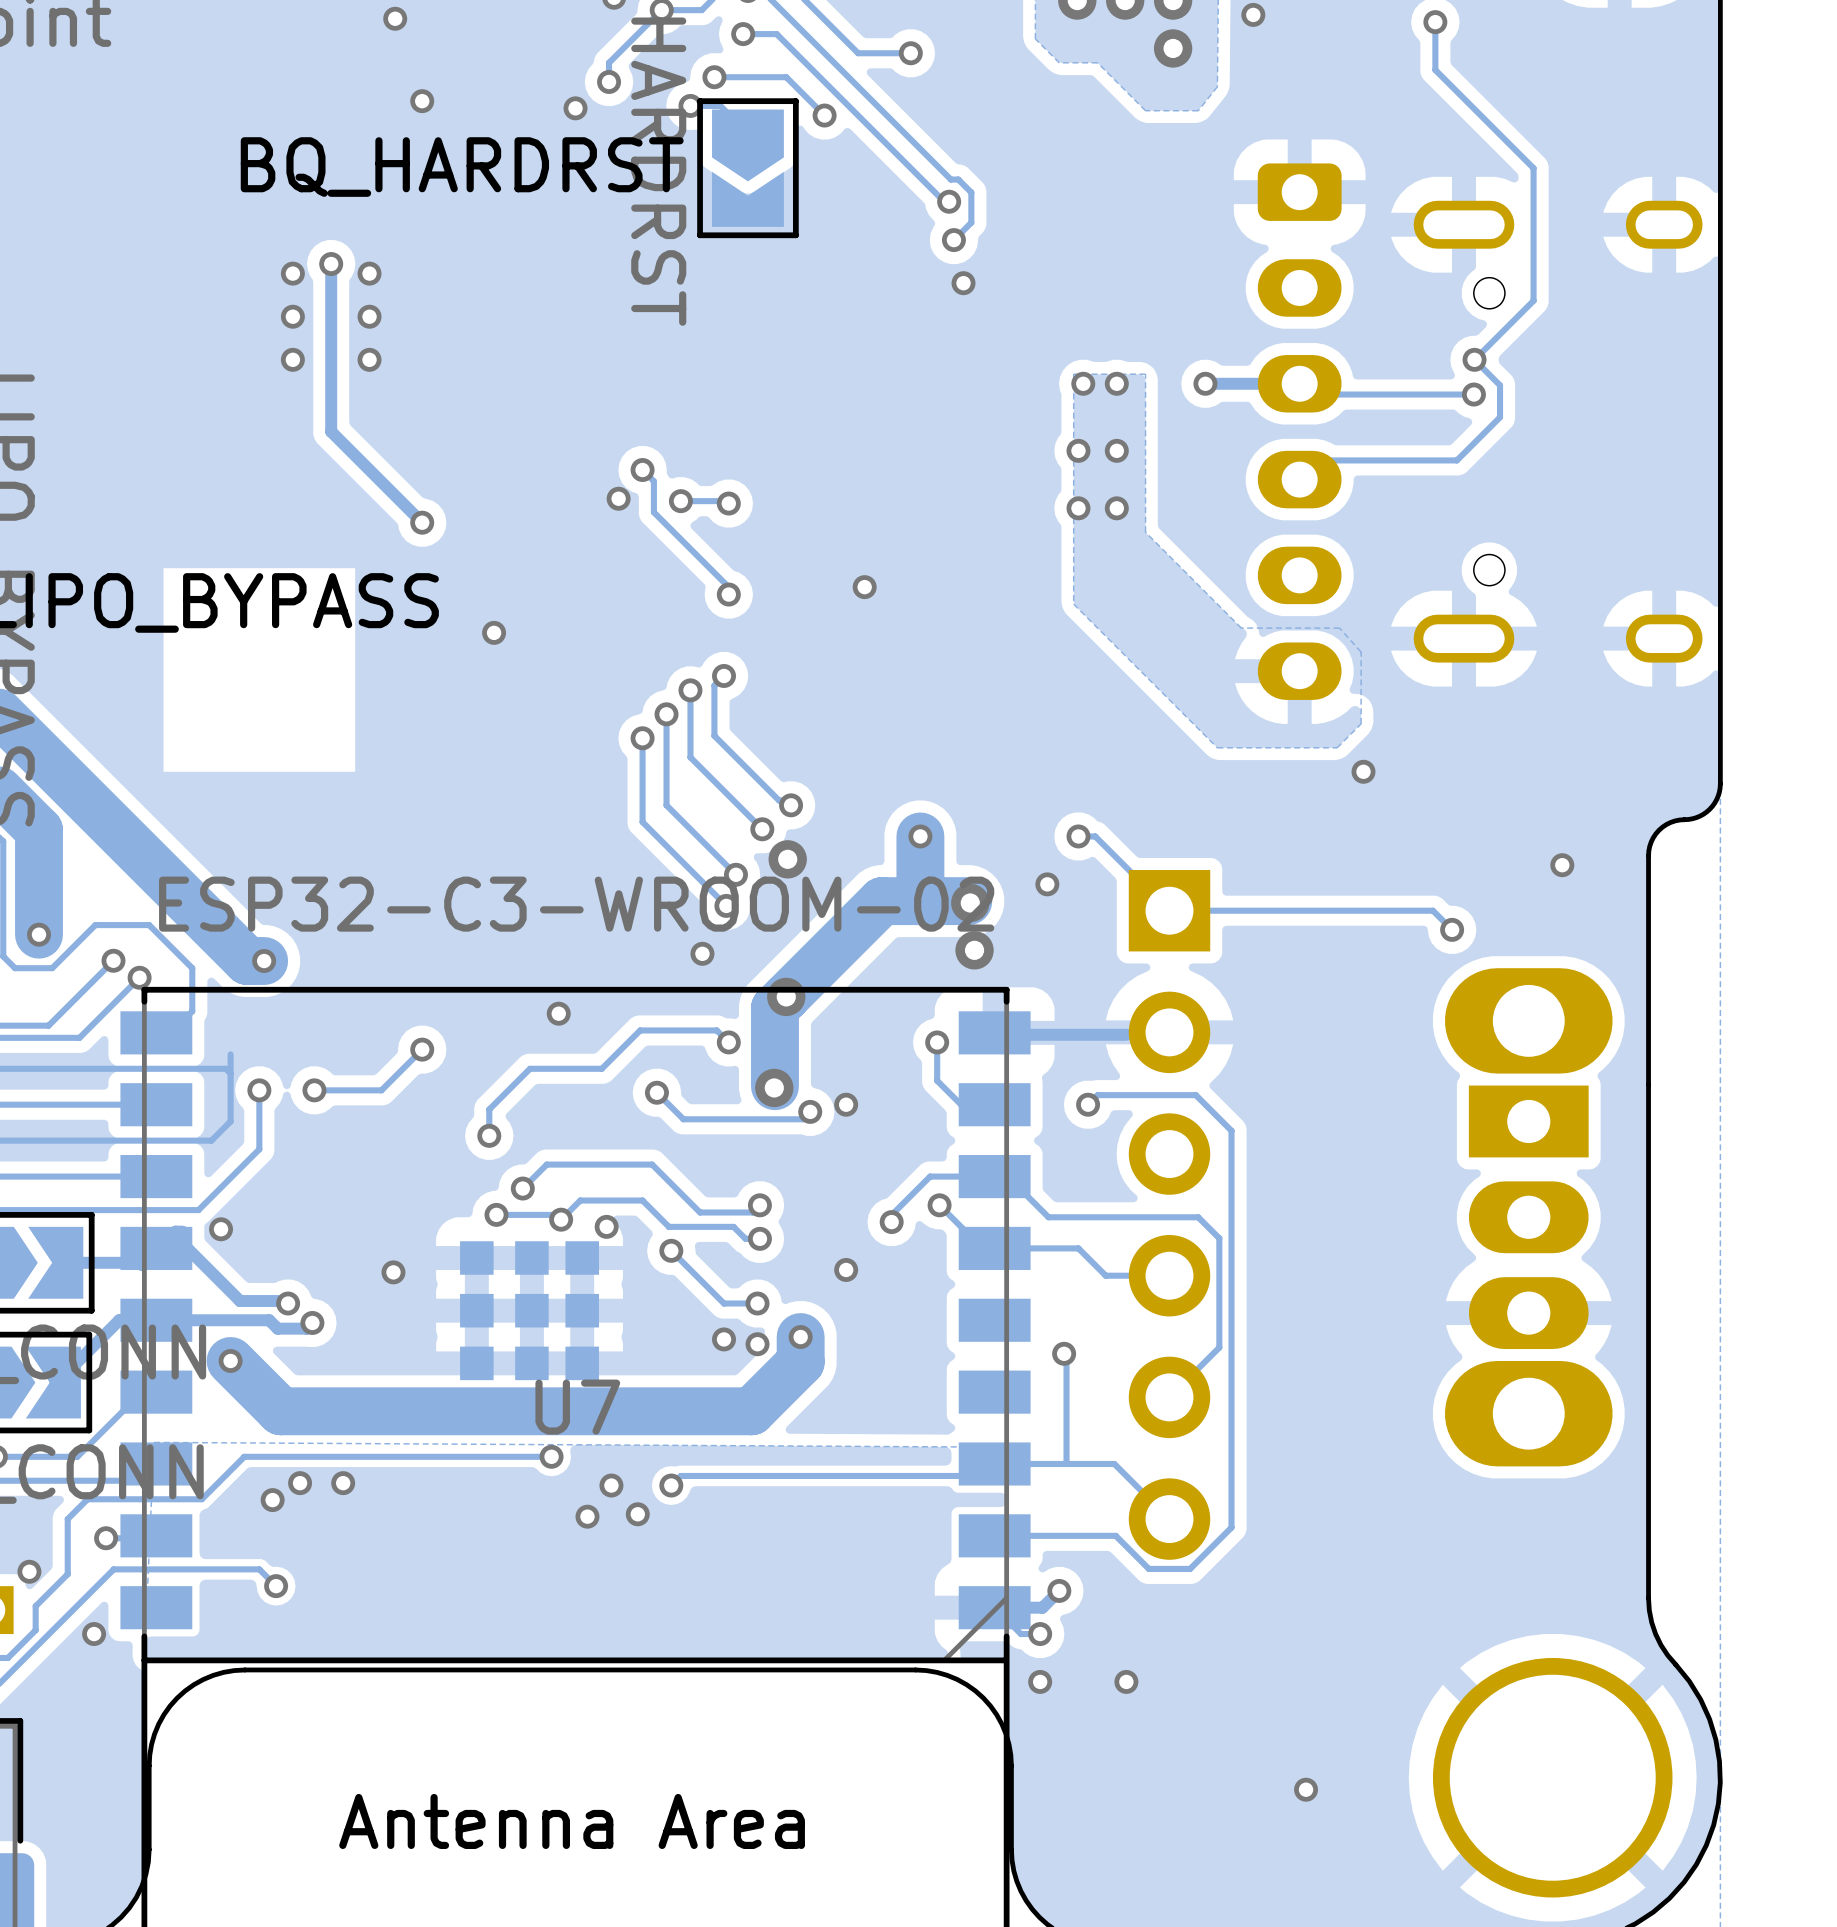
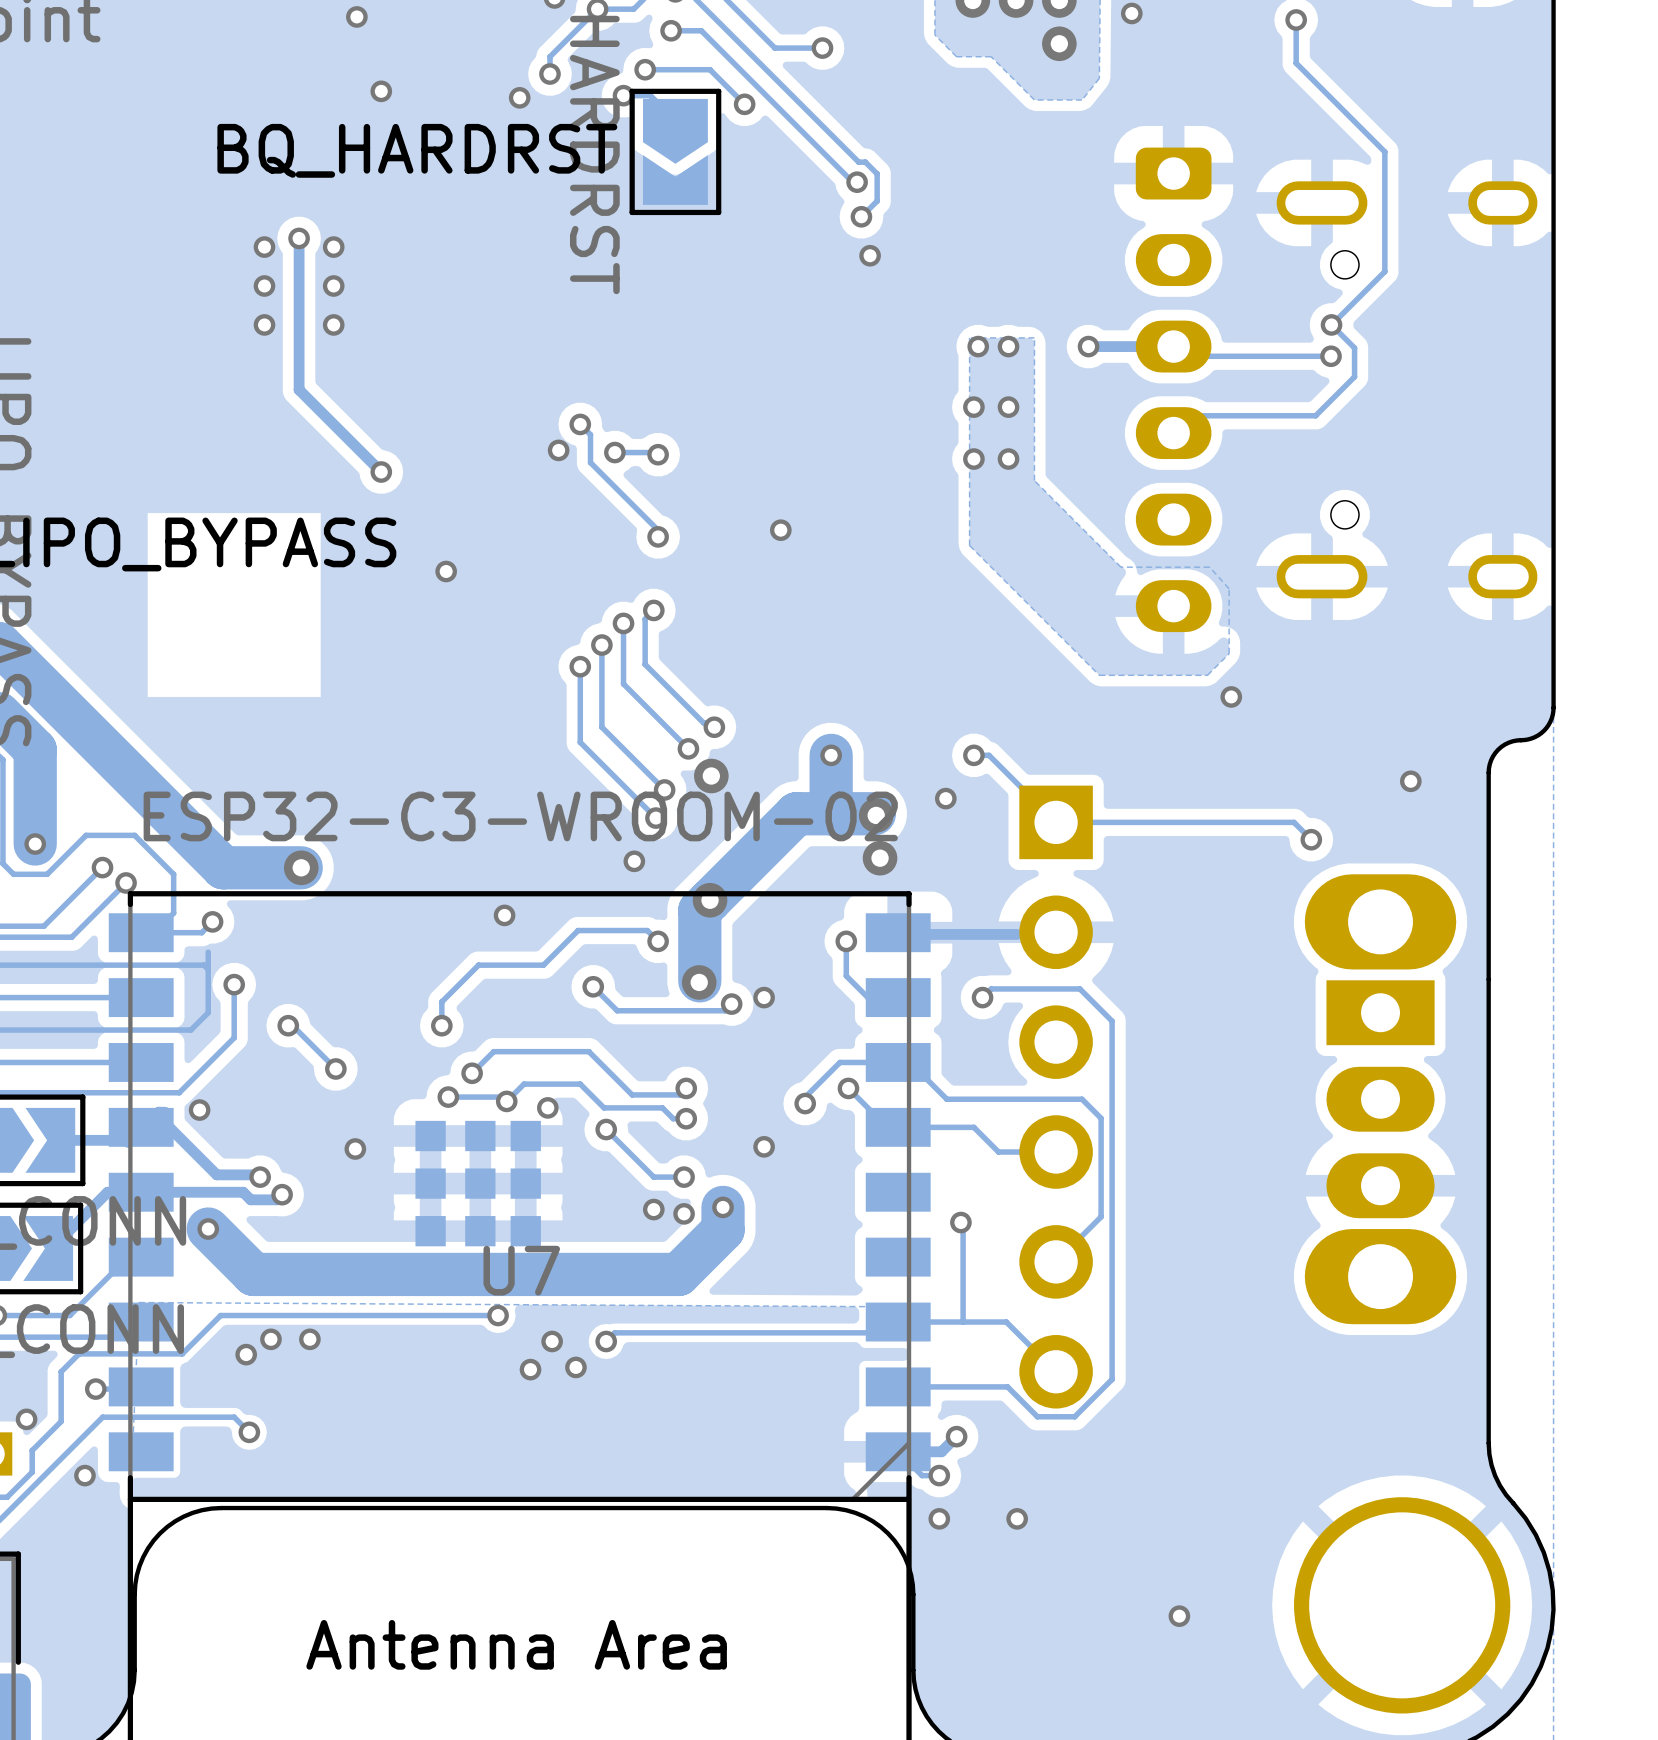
via: (264, 961) -> none
track: none -> (301, 867) (238, 867)
via: none -> (301, 867)
track: none -> (212, 921) (201, 932) (154, 932)
via: none -> (212, 921)
track: (422, 1049) (381, 1090) (314, 1090) -> none
via: (422, 1049) -> none
via position: (314, 1090) -> (288, 1025)
track: none -> (288, 1025) (292, 1025) (335, 1068)
via: none -> (335, 1068)

